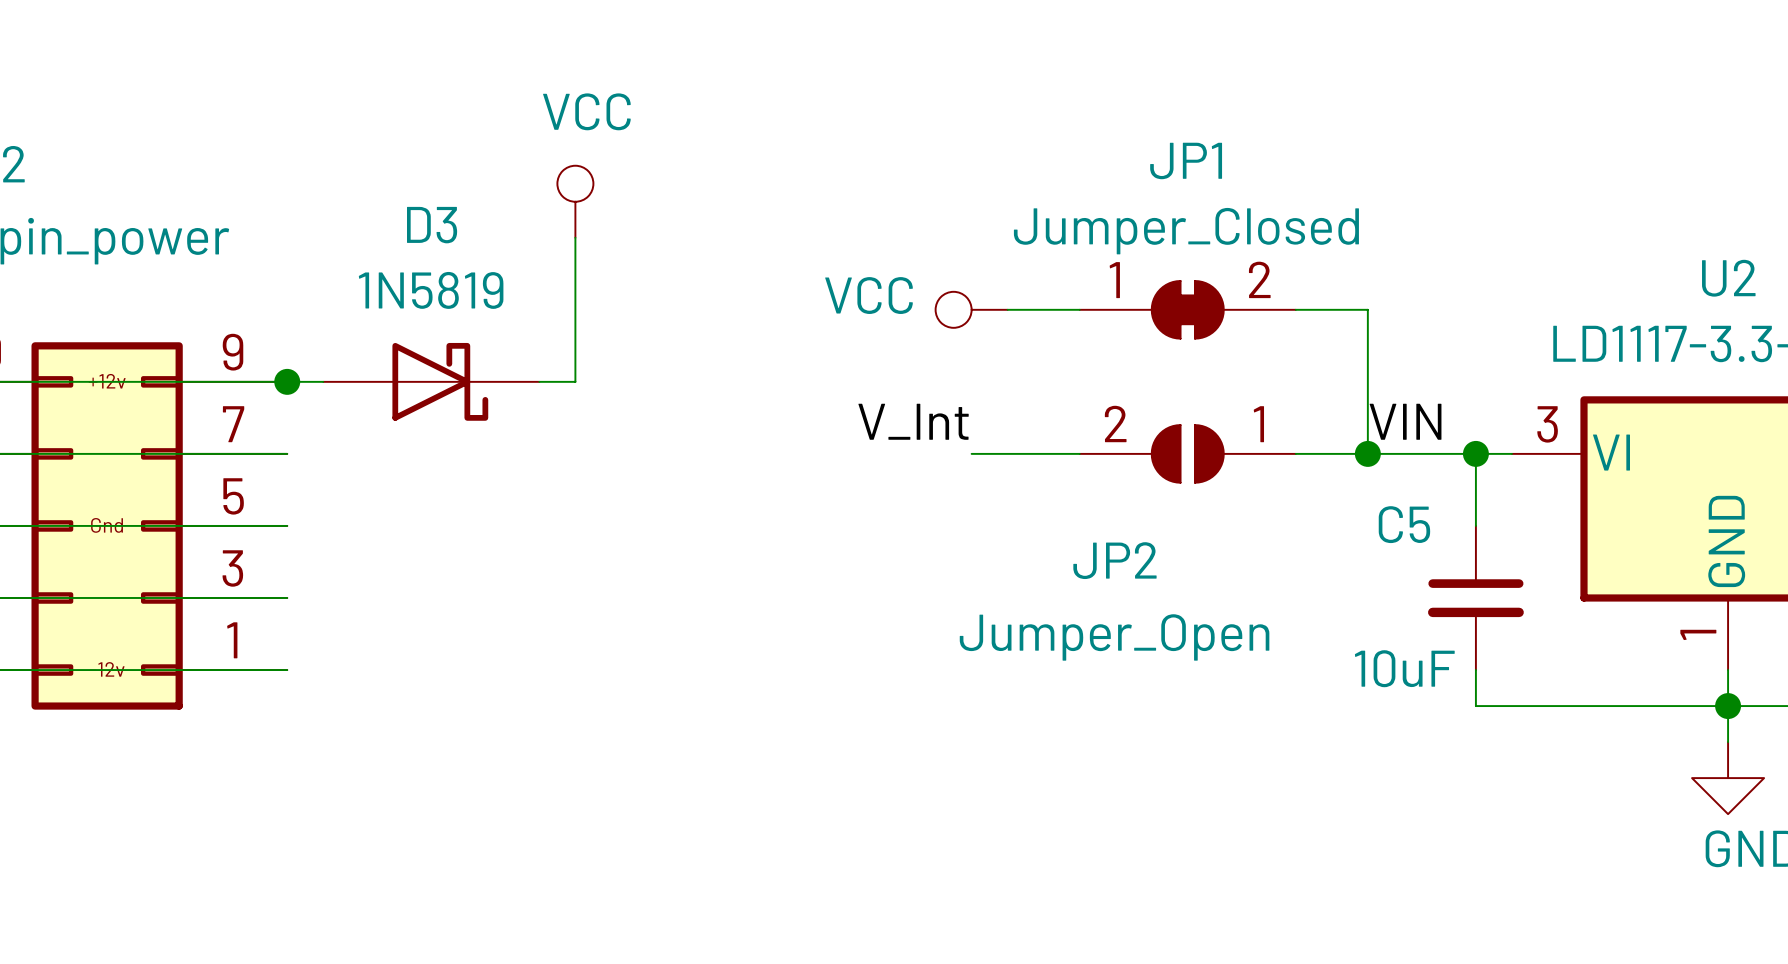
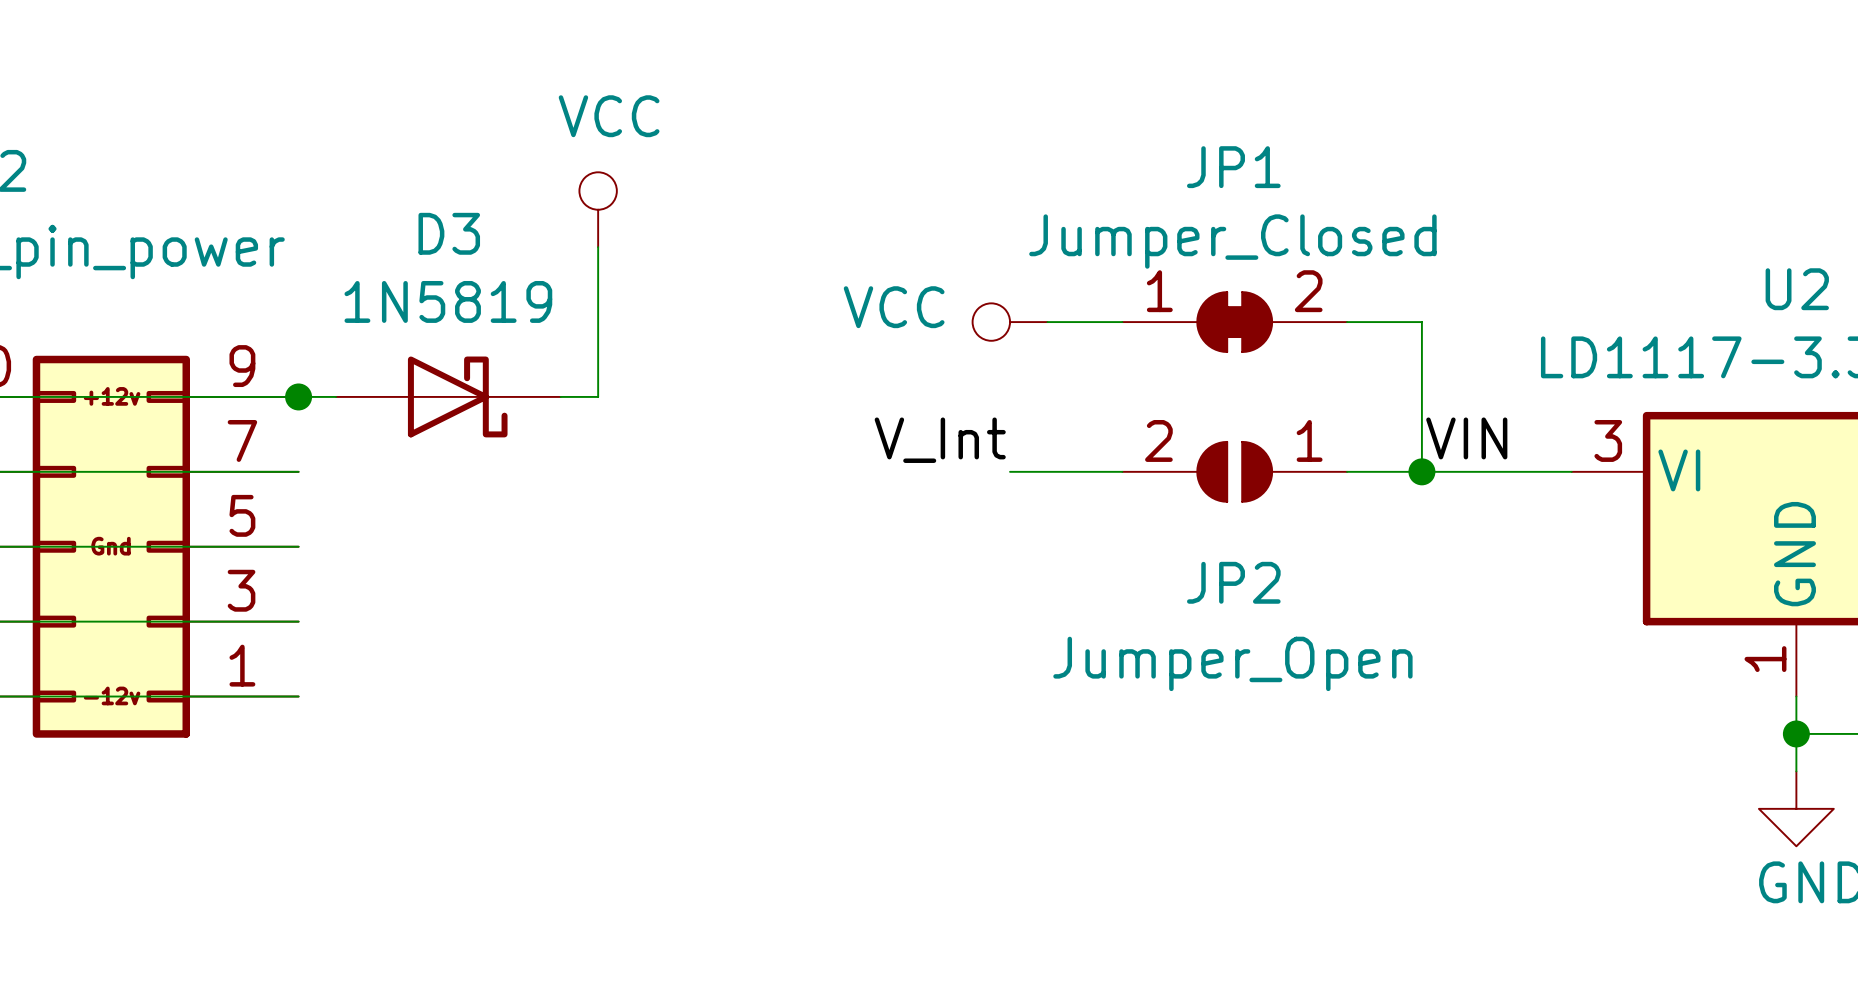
wire: (1475, 453) (1475, 525) -> none
junction: (1475, 453) -> none
JP2 name position: JP2 (1114, 560) -> JP2 (1233, 582)
C5: 10uF (1475, 597) -> none
JP2 value position: Jumper_Open (1114, 637) -> Jumper_Open (1232, 663)
wire: (1475, 670) (1475, 706) (1728, 706) -> none

